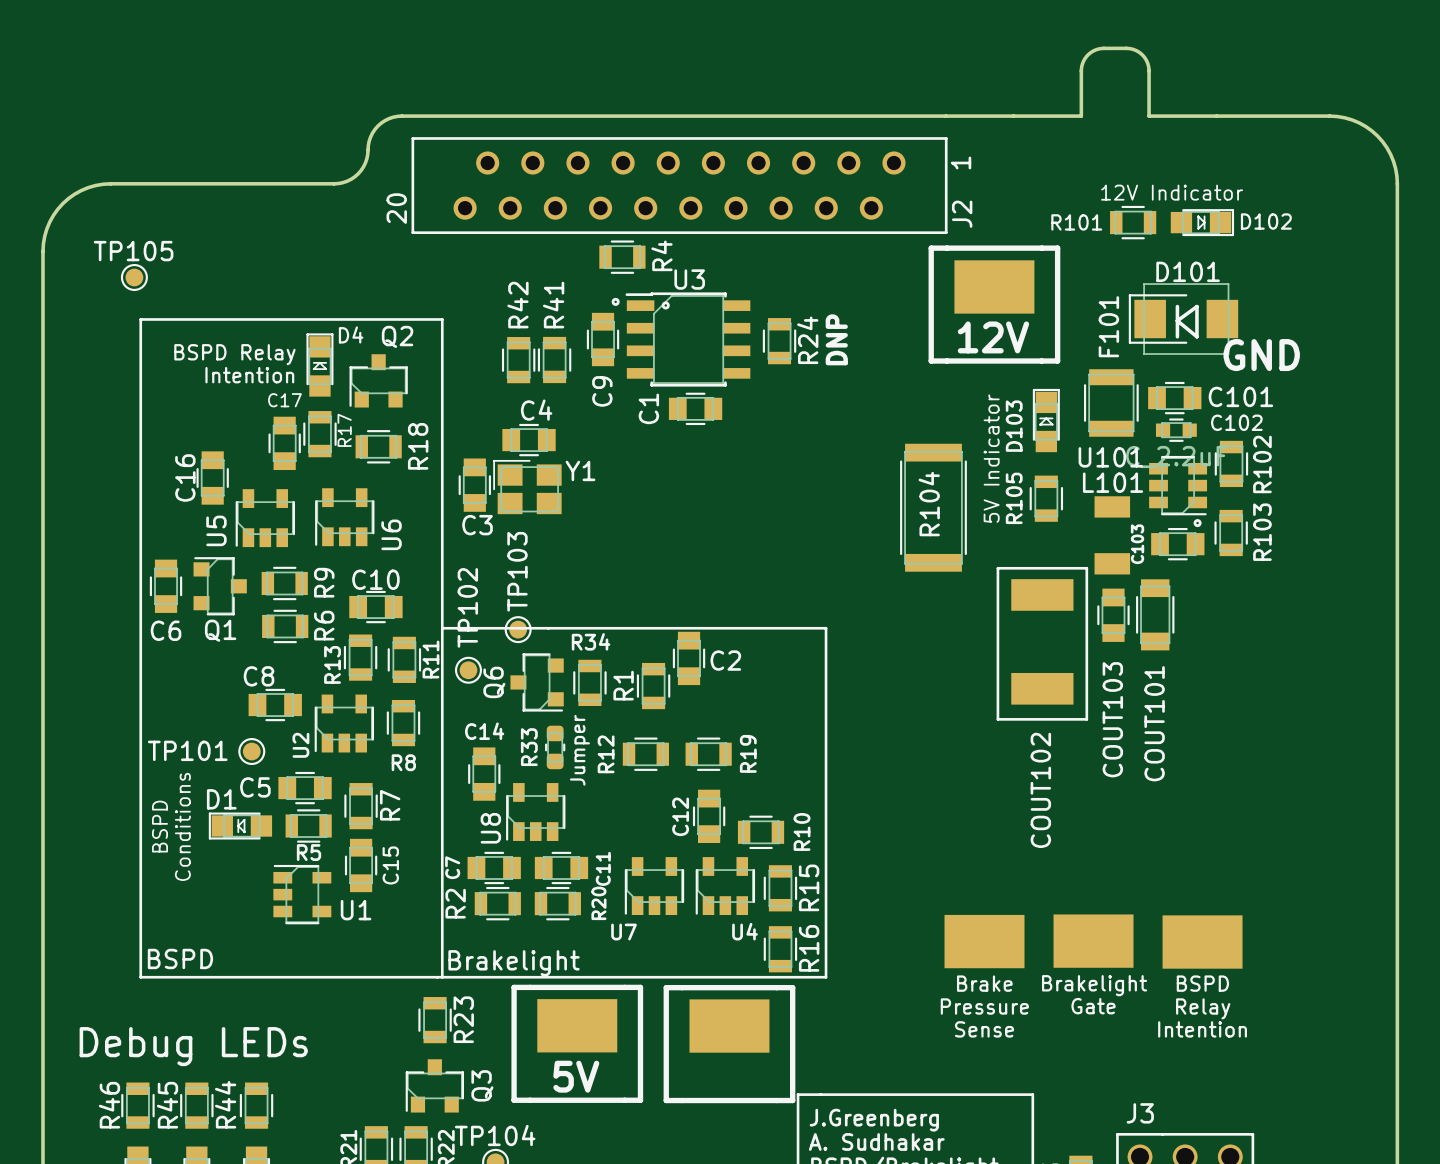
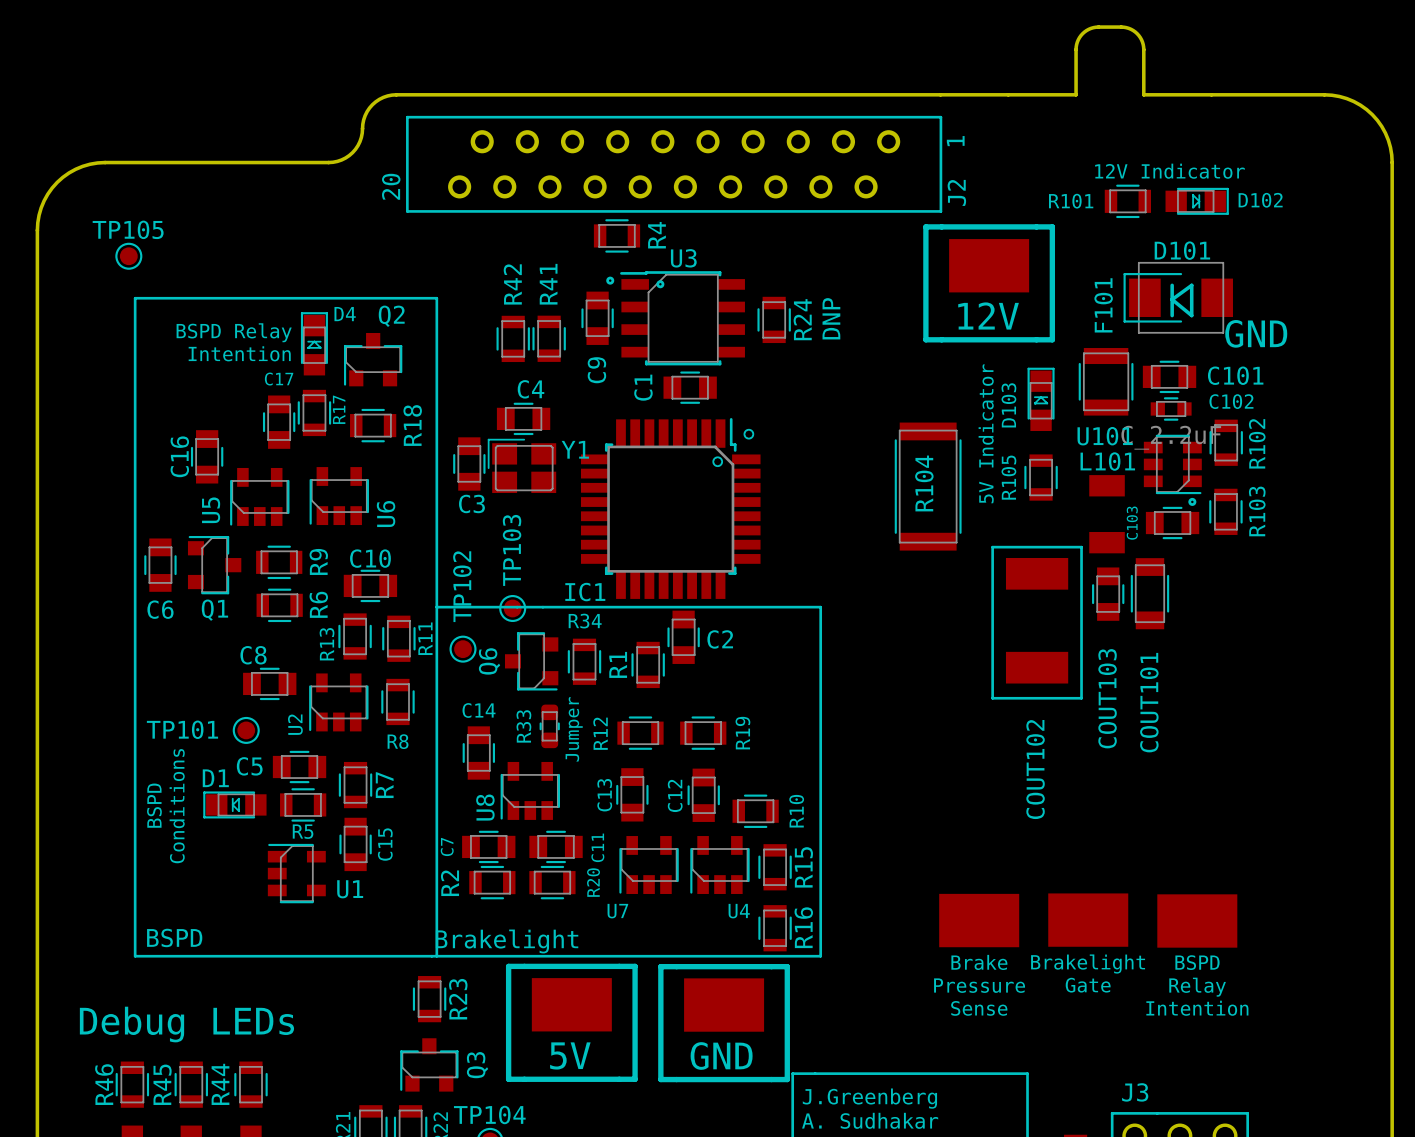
IC1: none -> (670, 508)
C13: none -> (632, 794)
text: none -> GND (721, 1056)

